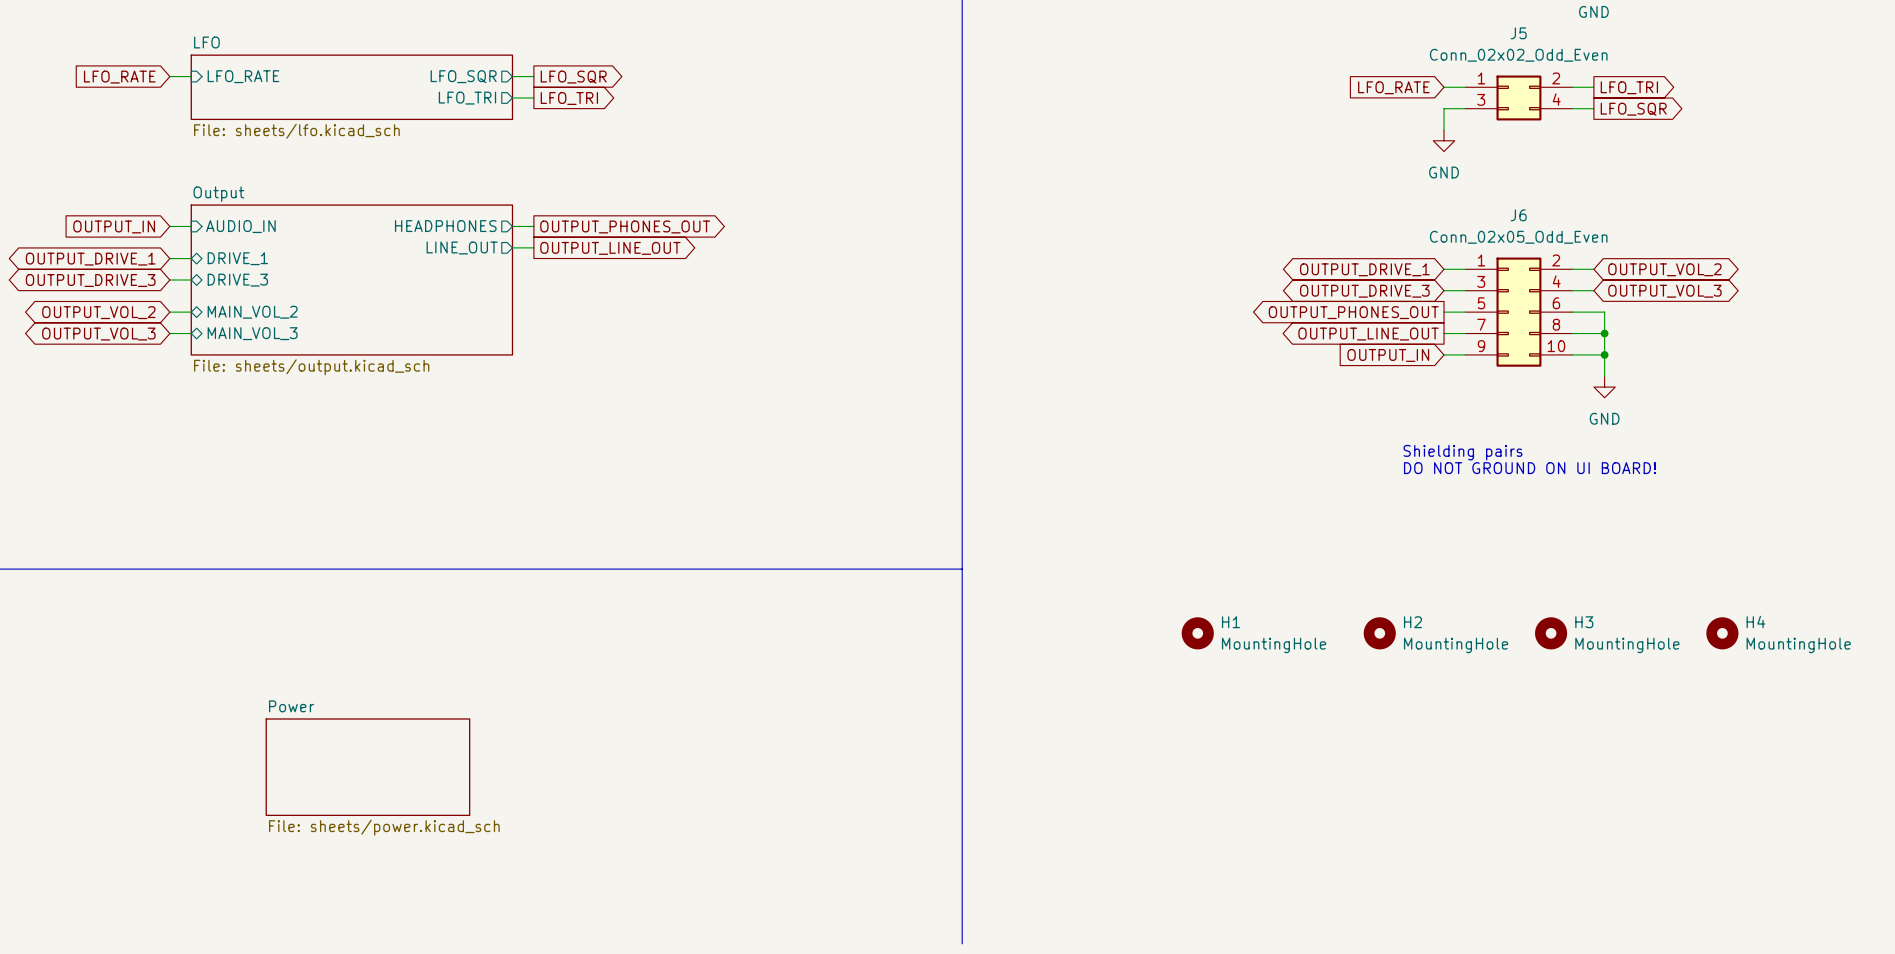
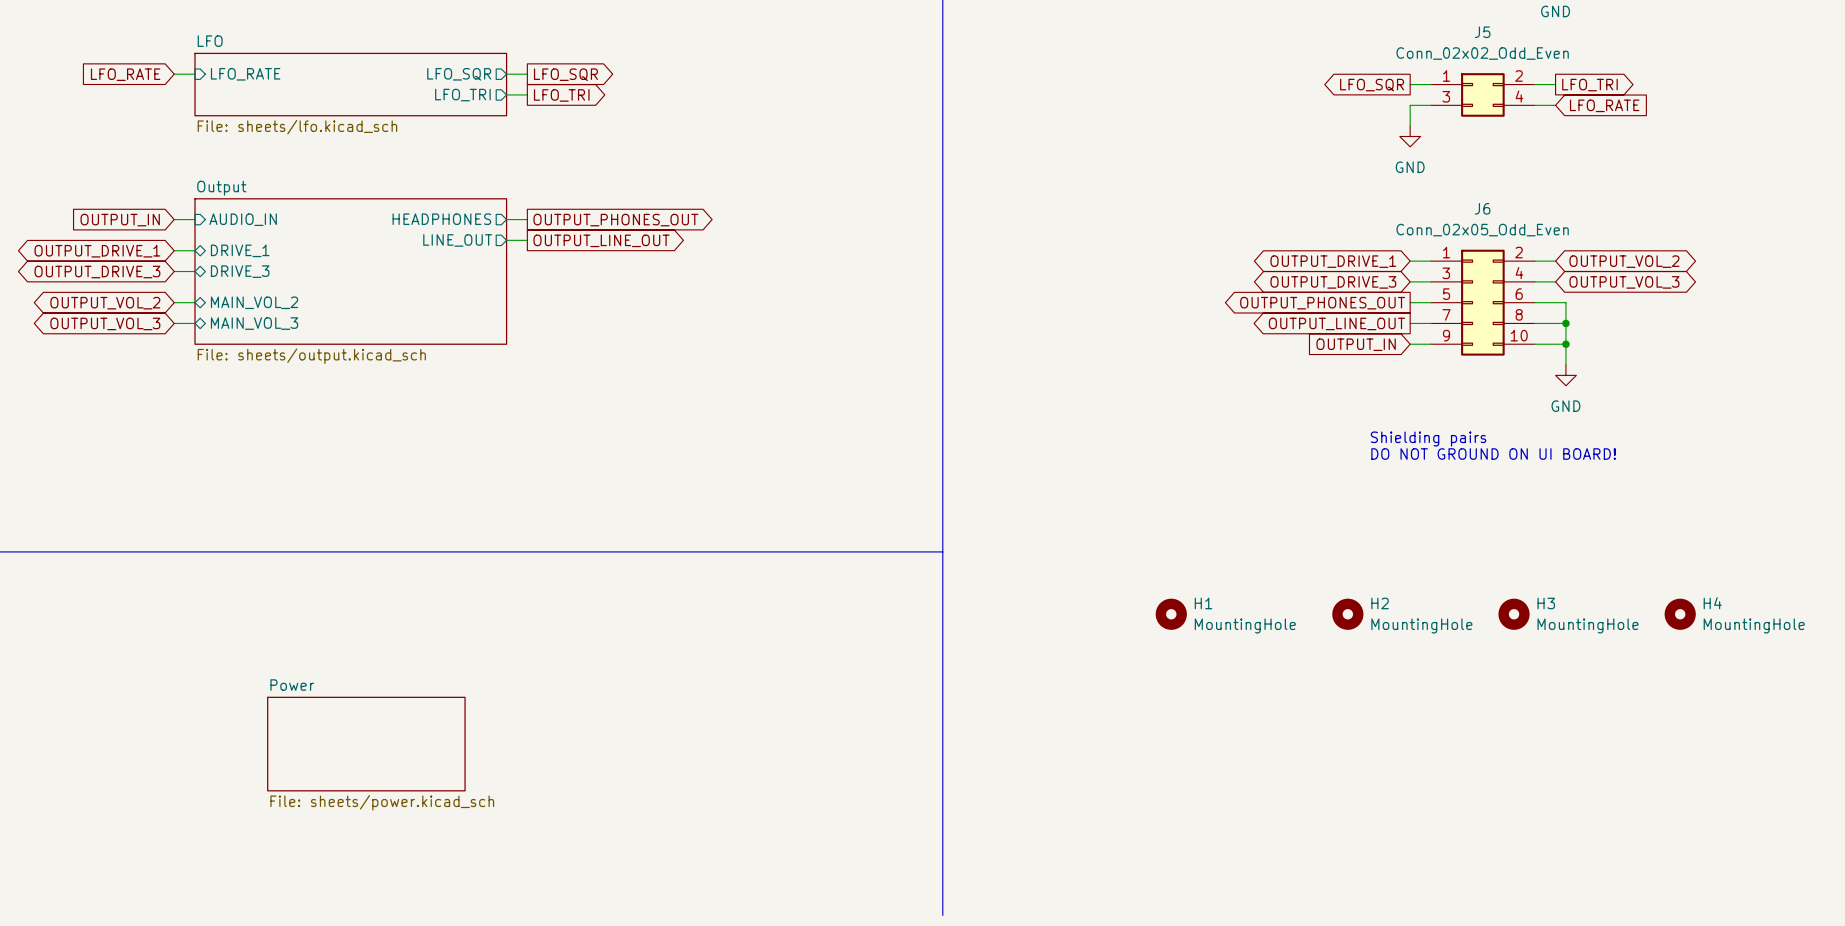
global label shape: input (1393, 87) -> output (1372, 85)
global label: LFO_RATE (1393, 87) -> LFO_SQR (1372, 85)
global label shape: output (1633, 109) -> input (1604, 105)
global label: LFO_SQR (1633, 109) -> LFO_RATE (1604, 105)

